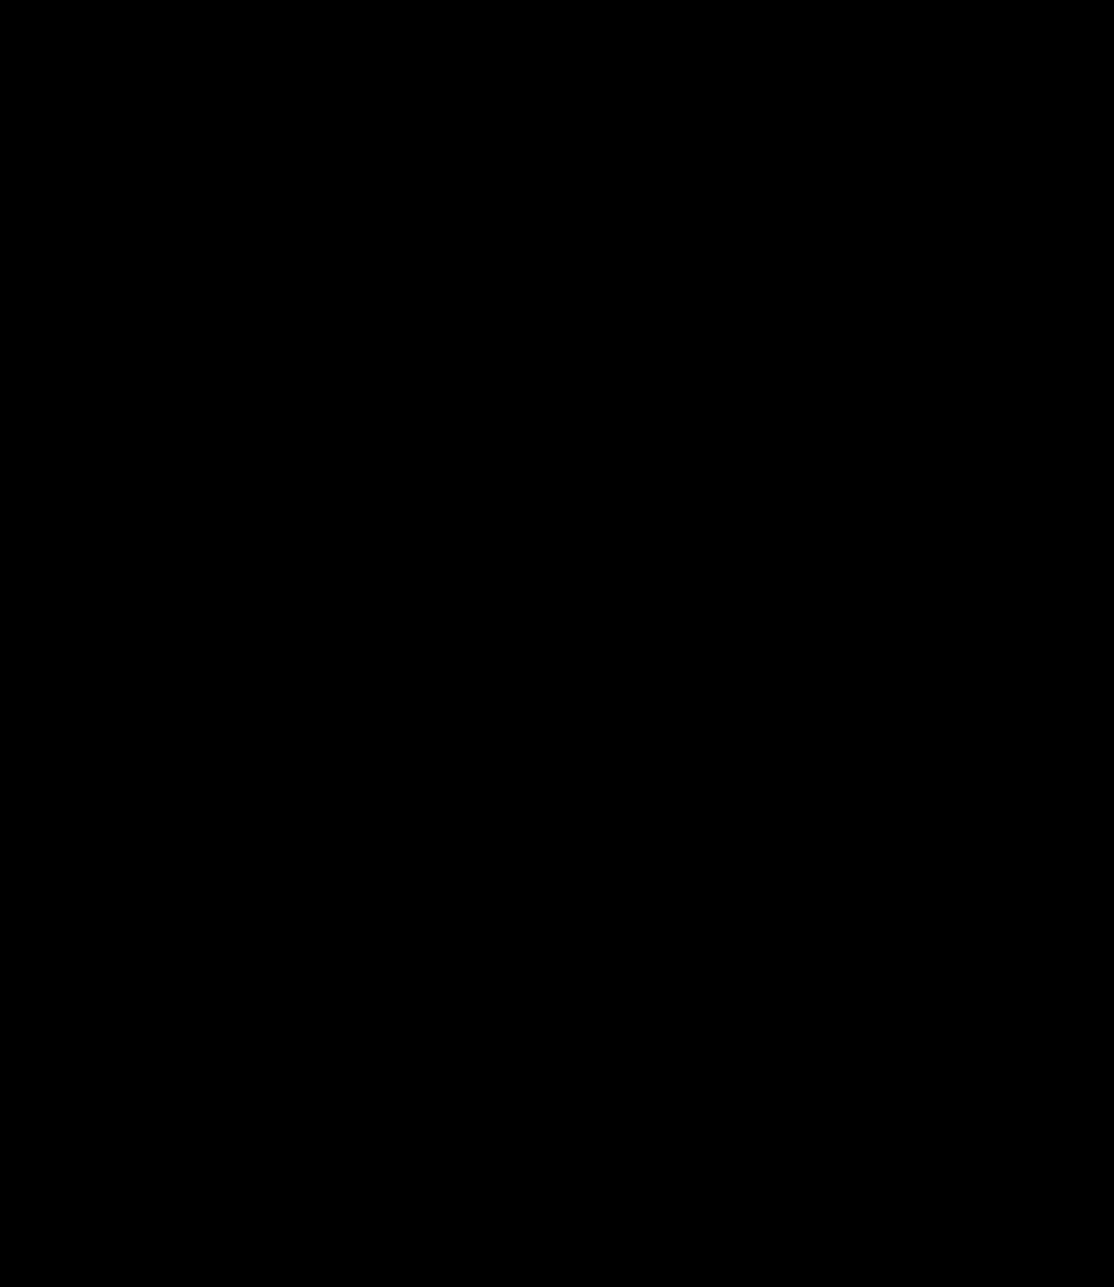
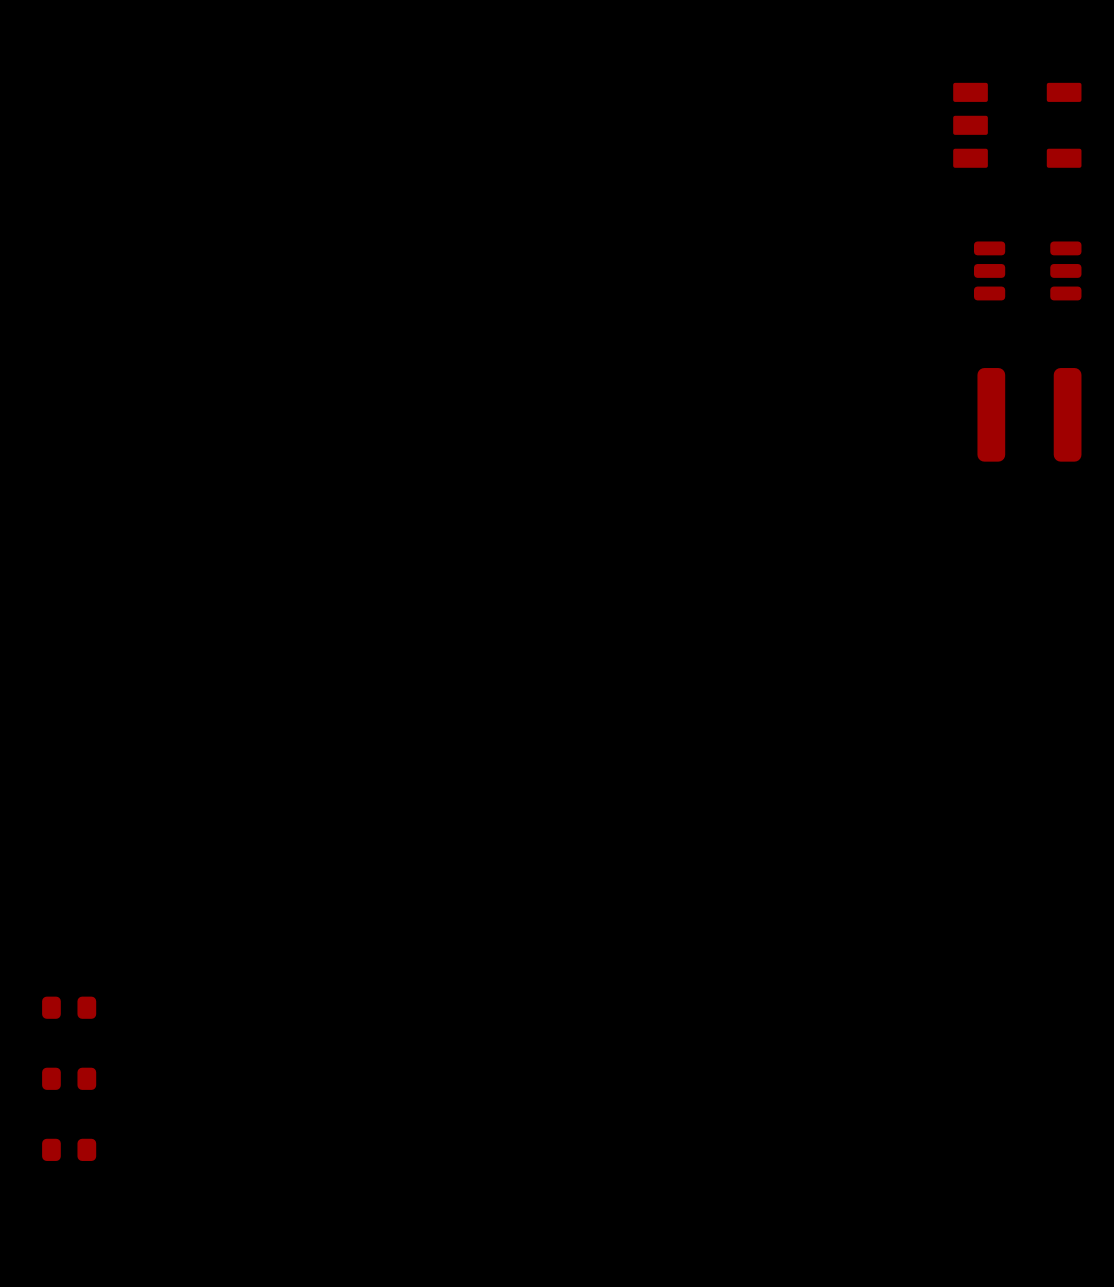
part: none -> (1017, 125)
part: none -> (1027, 270)
part: none -> (1029, 414)
part: none -> (69, 1007)
part: none -> (69, 1078)
part: none -> (69, 1149)

